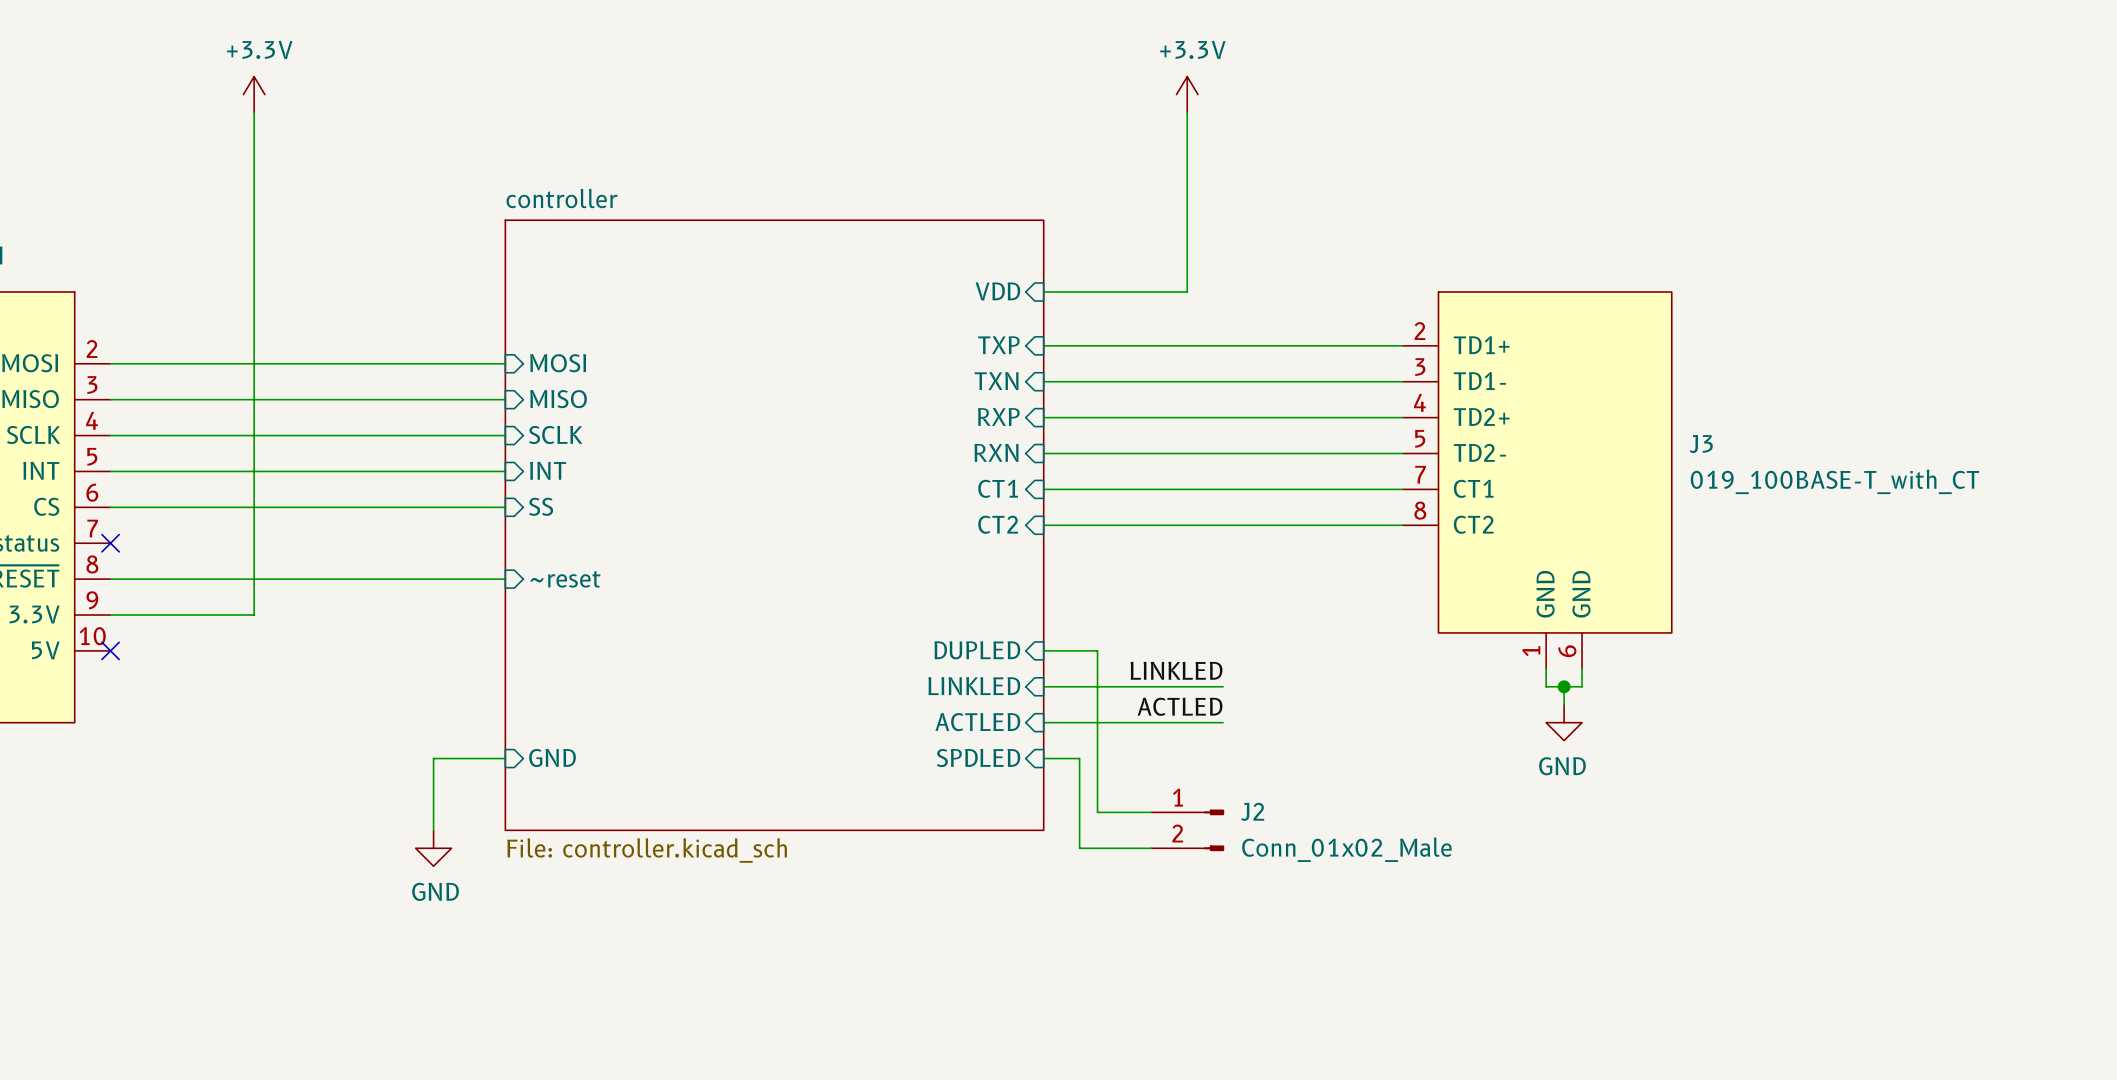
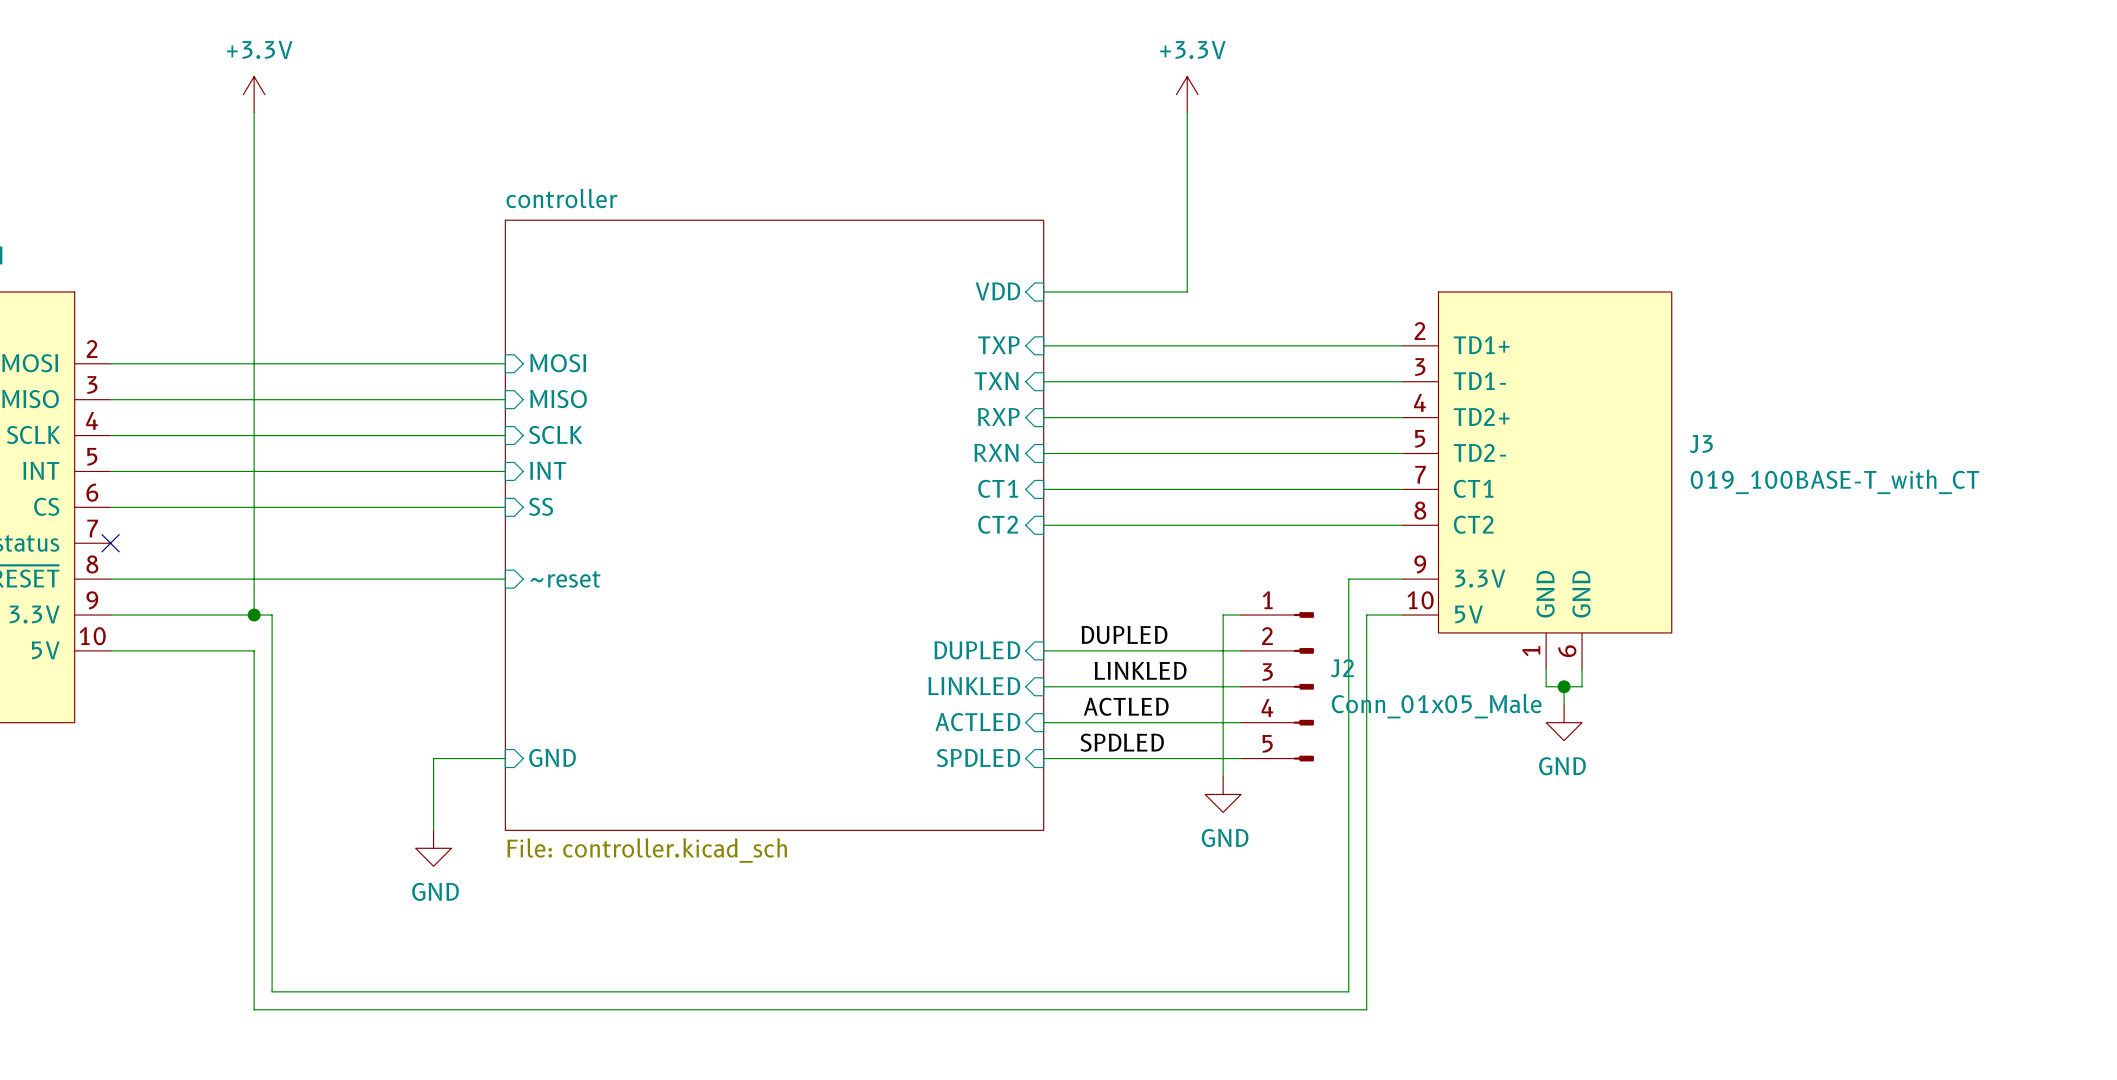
J3 symbol: [1402, 292, 1672, 669] -> [1402, 292, 1672, 669]
wire: none -> (1402, 579) (1348, 579) (1348, 991) (272, 991) (272, 615) (254, 615)
junction: none -> (254, 615)
wire: none -> (1241, 615) (1223, 615) (1223, 776)
wire: none -> (1402, 615) (1366, 615) (1366, 1009) (254, 1009) (254, 650) (110, 650)
label: none -> DUPLED (1124, 634)
no-connect mark: (110, 650) -> none
wire: (1097, 650) (1097, 812) (1151, 812) -> (1097, 650) (1241, 650)
label position: LINKLED (1176, 670) -> LINKLED (1140, 670)
wire: none -> (1223, 686) (1241, 686)
label position: ACTLED (1180, 706) -> ACTLED (1126, 706)
wire: none -> (1223, 722) (1241, 722)
label: none -> SPDLED (1122, 742)
wire: (1079, 758) (1079, 848) (1151, 848) -> (1079, 758) (1241, 758)
power symbol: none -> GND (1223, 794)
J2 symbol: [1151, 809, 1225, 852] -> [1241, 612, 1314, 762]
J2 value: Conn_01x02_Male (1346, 849) -> Conn_01x05_Male (1436, 706)

